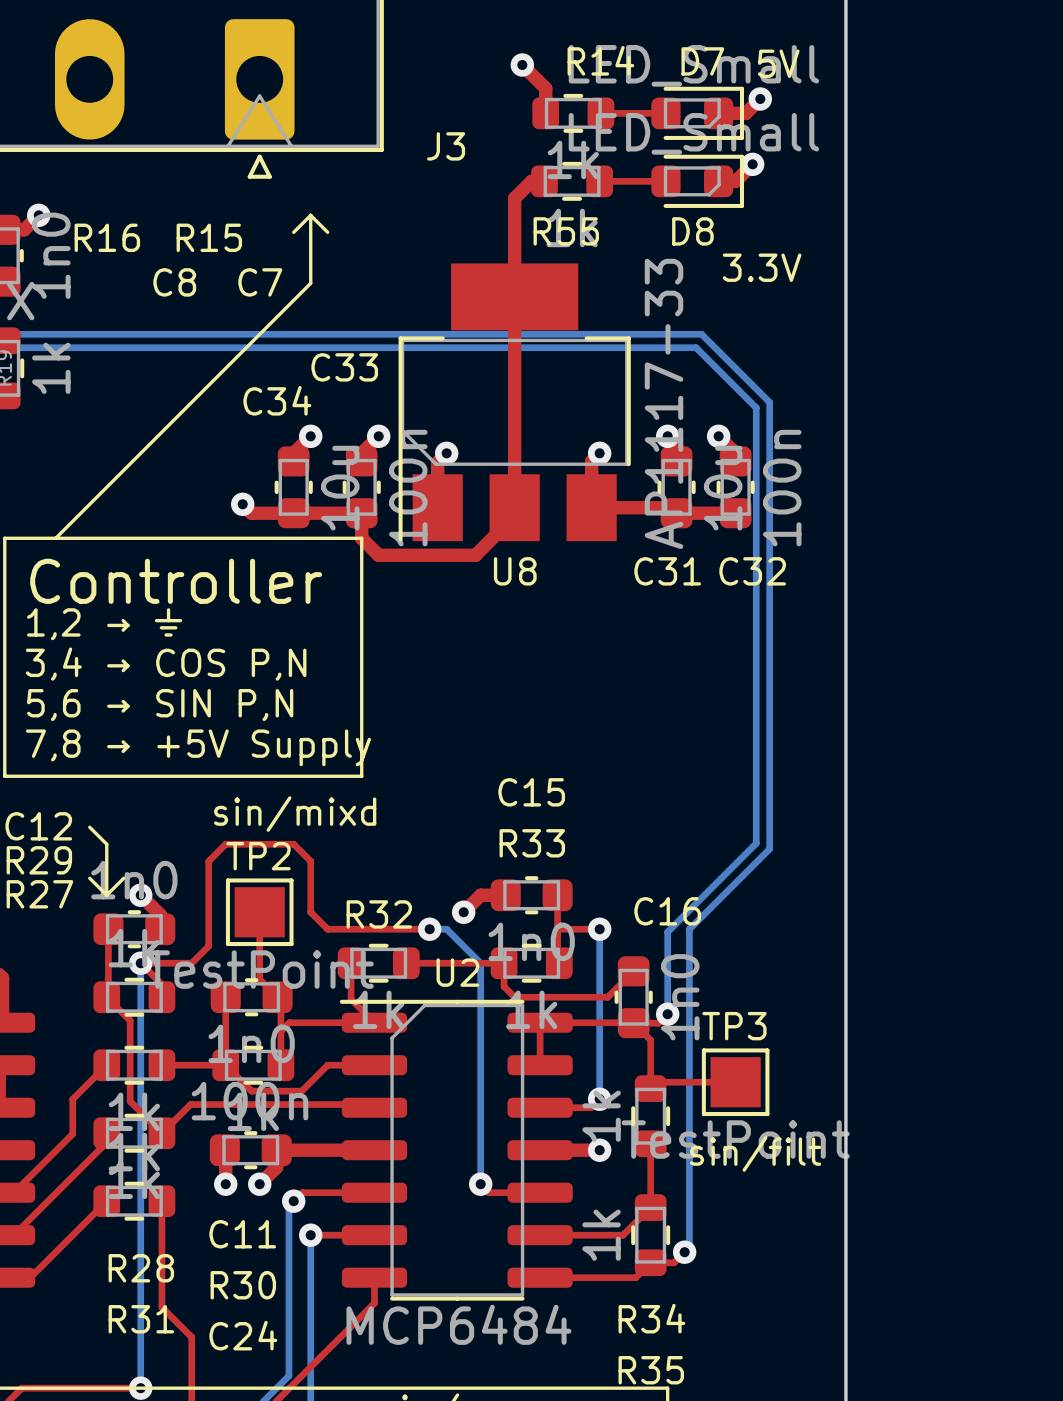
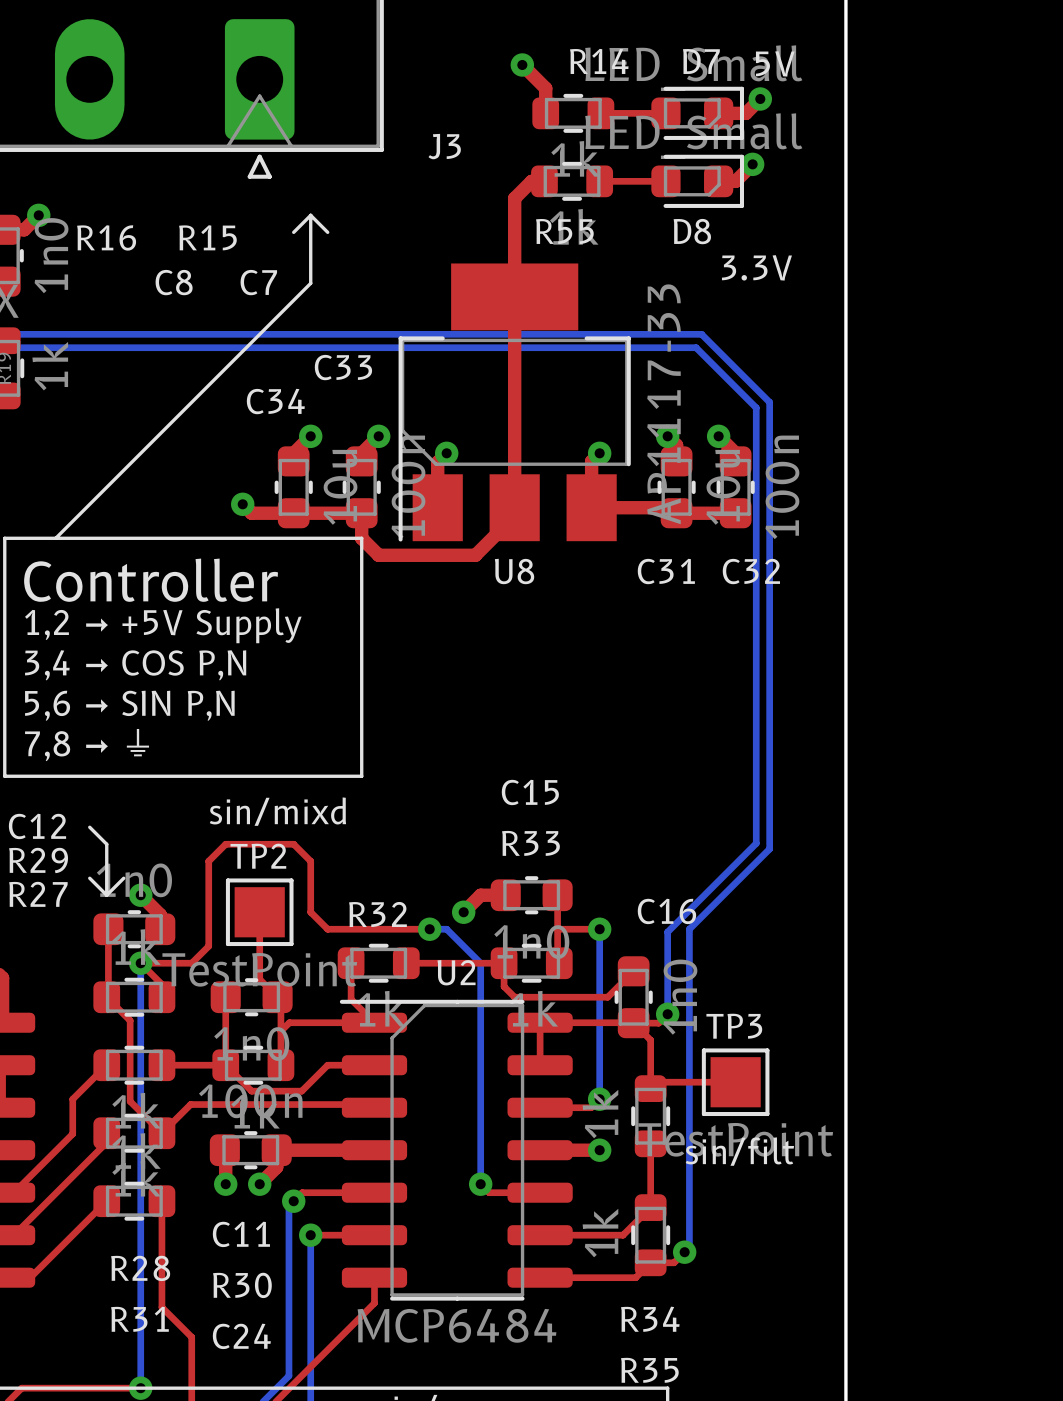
text: 1,2 → ⏚ (104, 624) -> 1,2 → +5V Supply (163, 625)
text: 7,8 → +5V Supply (198, 747) -> 7,8 → ⏚ (87, 745)

